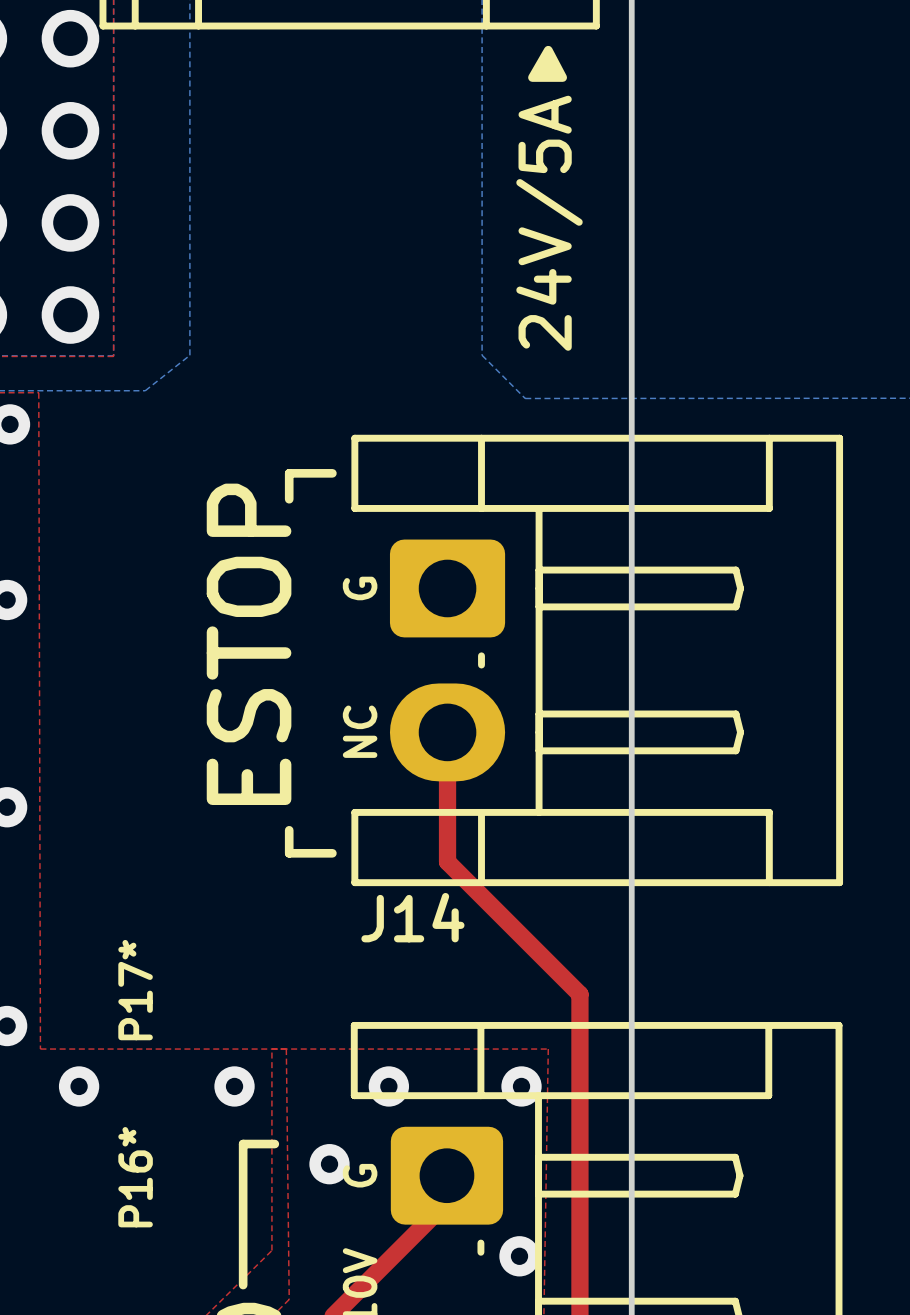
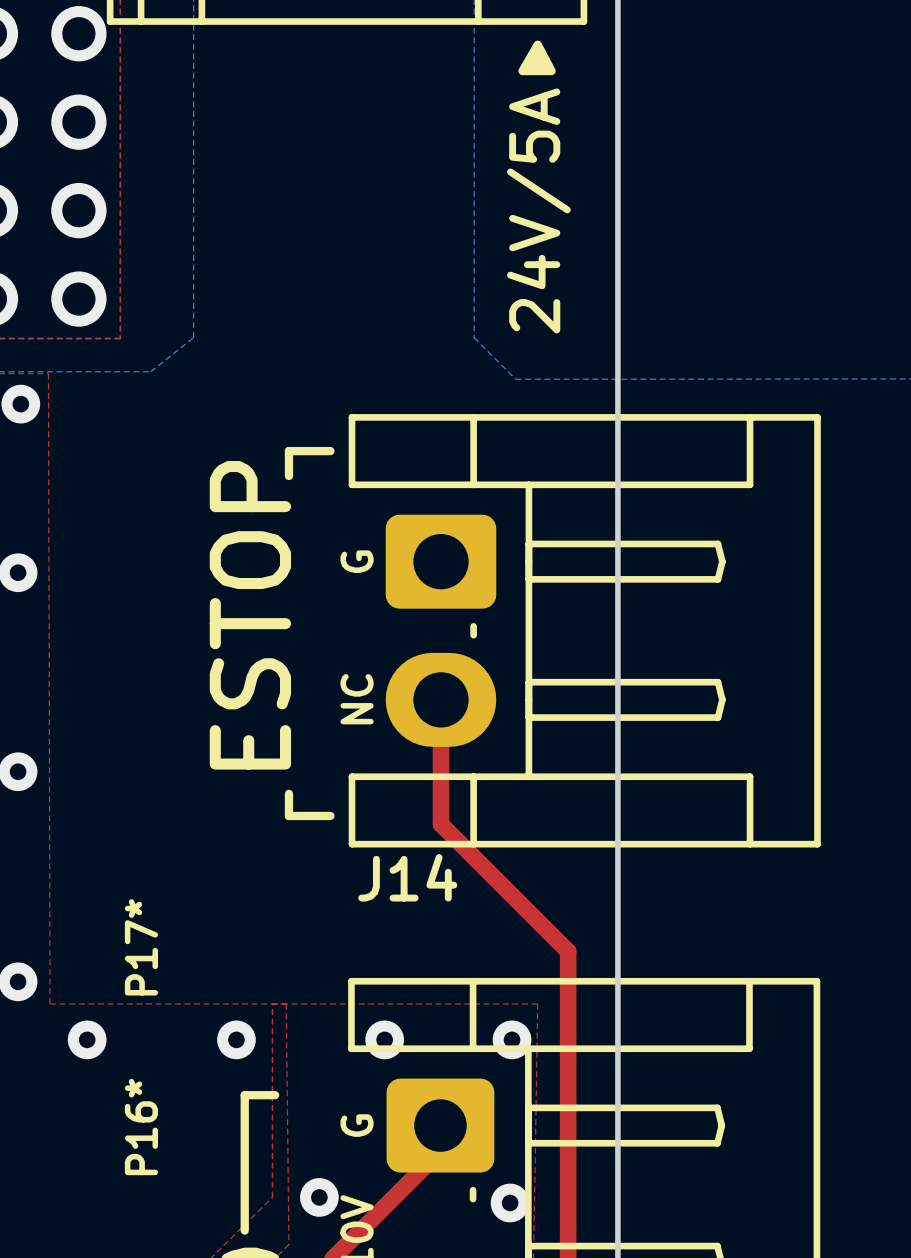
via position: (329, 1164) -> (319, 1197)

